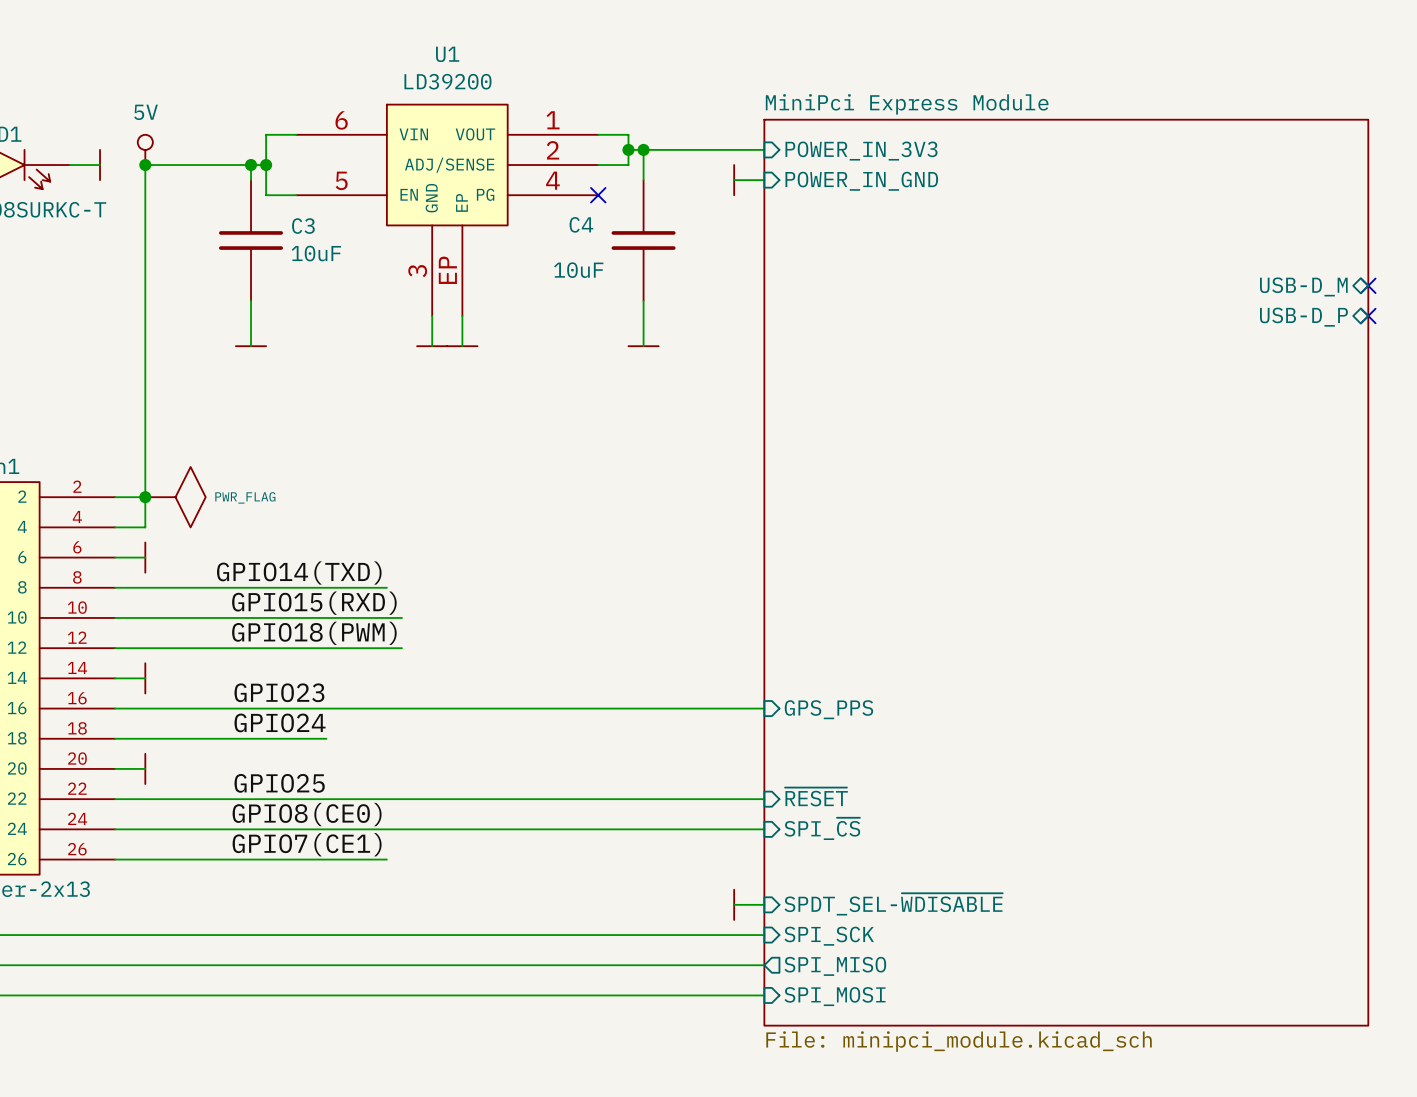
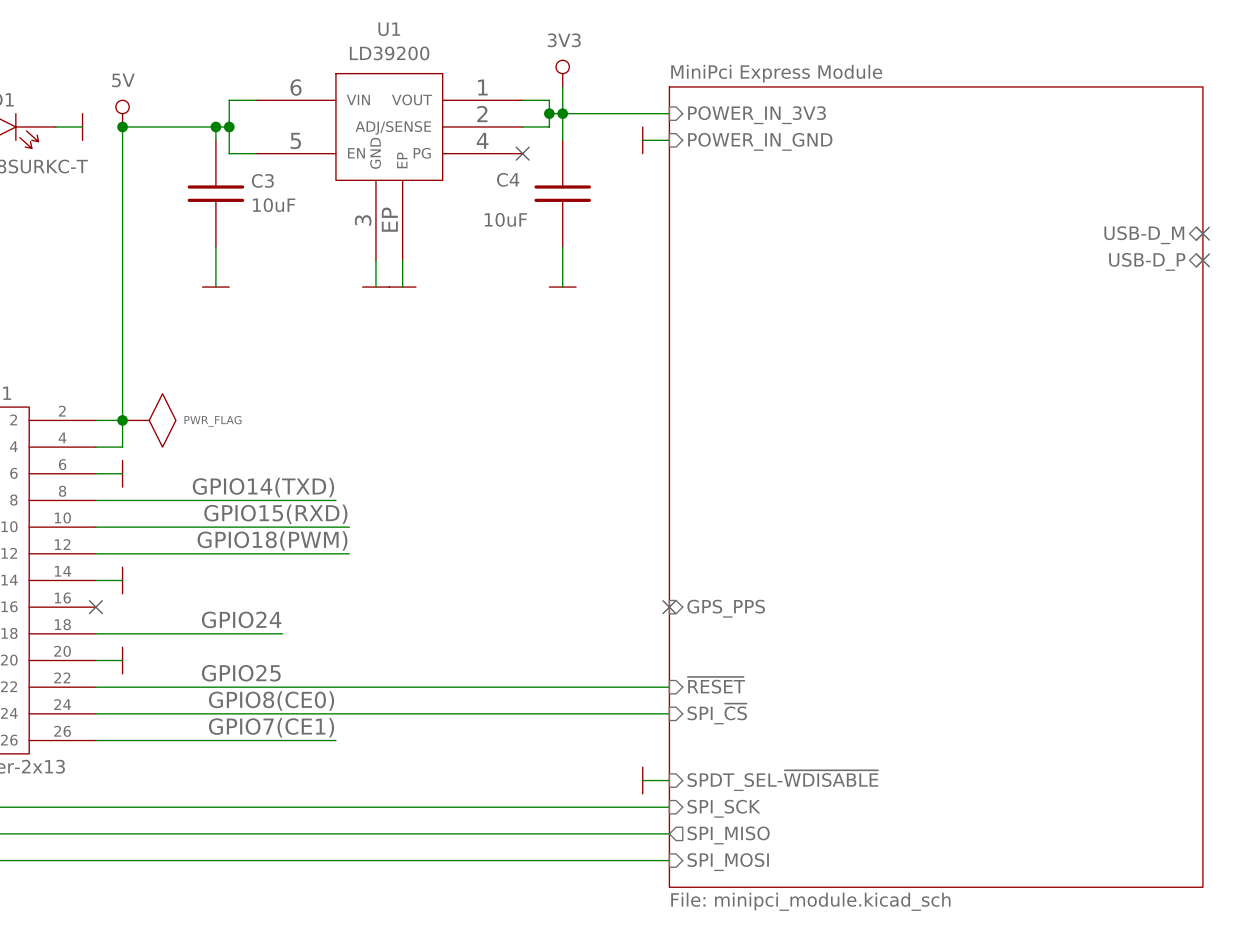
power symbol: none -> 3V3 (562, 73)
wire: none -> (562, 86) (562, 113)
label: GPIO23 (279, 692) -> none
wire: (115, 708) (764, 708) -> none
no-connect mark: none -> (95, 607)
no-connect mark: none -> (669, 607)

